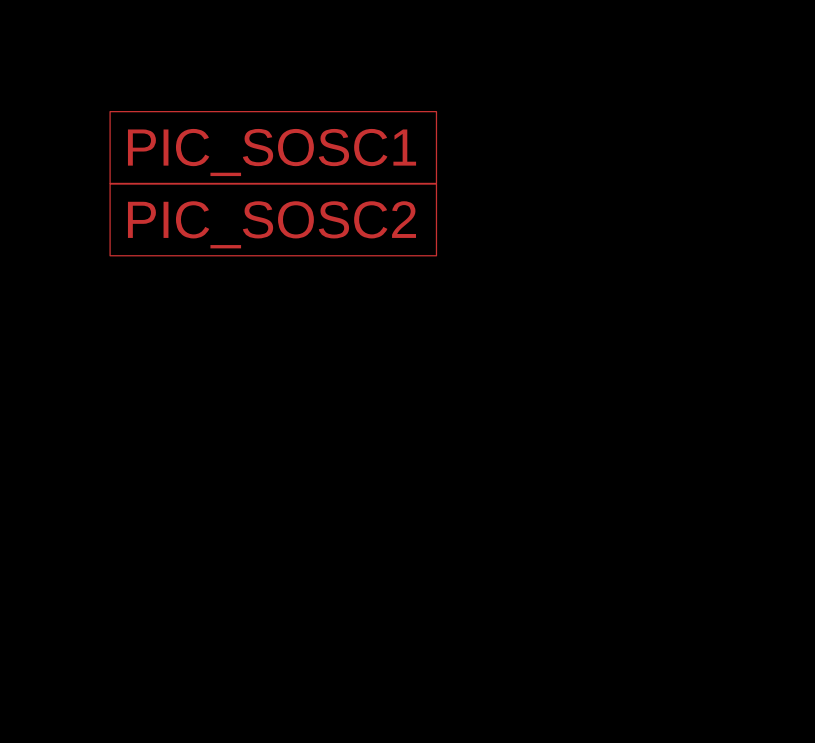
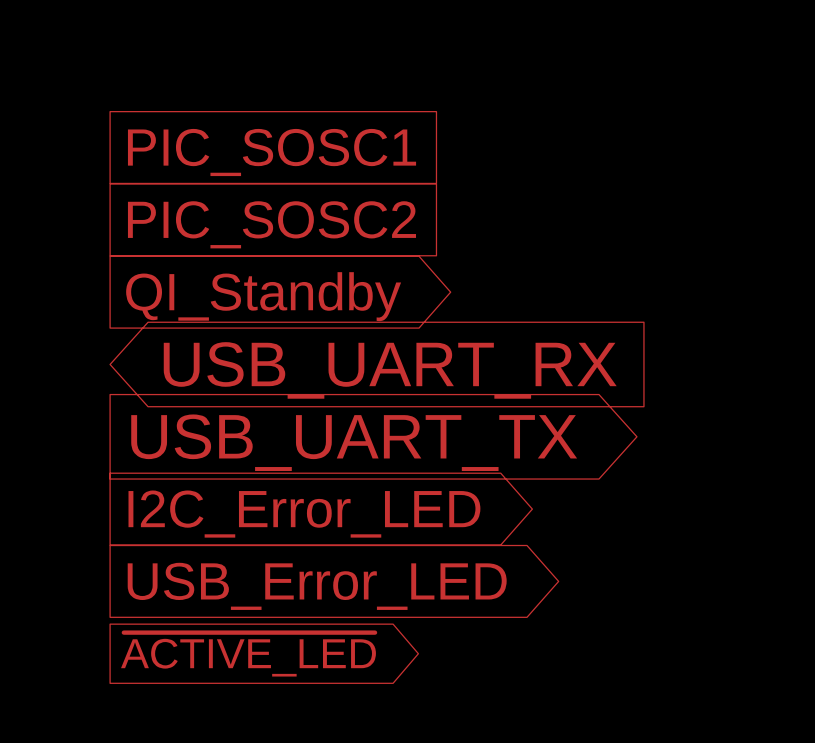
global label: none -> QI_Standby (263, 296)
global label: none -> USB_UART_RX (390, 370)
global label: none -> USB_UART_TX (354, 442)
global label: none -> I2C_Error_LED (304, 514)
global label: none -> USB_Error_LED (317, 586)
global label: none -> ~{ACTIVE_LED} (248, 654)

